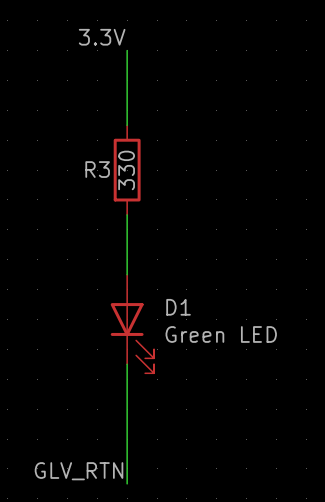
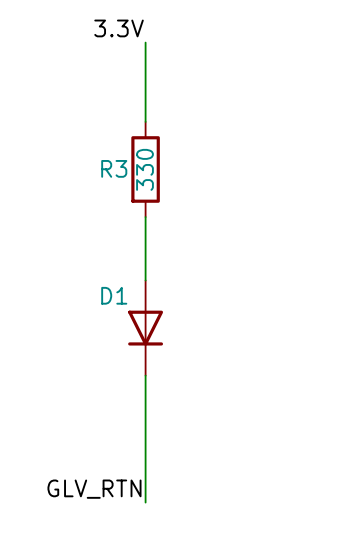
D1 symbol: [110, 274, 155, 374] -> [128, 280, 164, 376]
D1 name position: D1 (178, 307) -> D1 (114, 295)
D1 value: Green LED (221, 334) -> none

